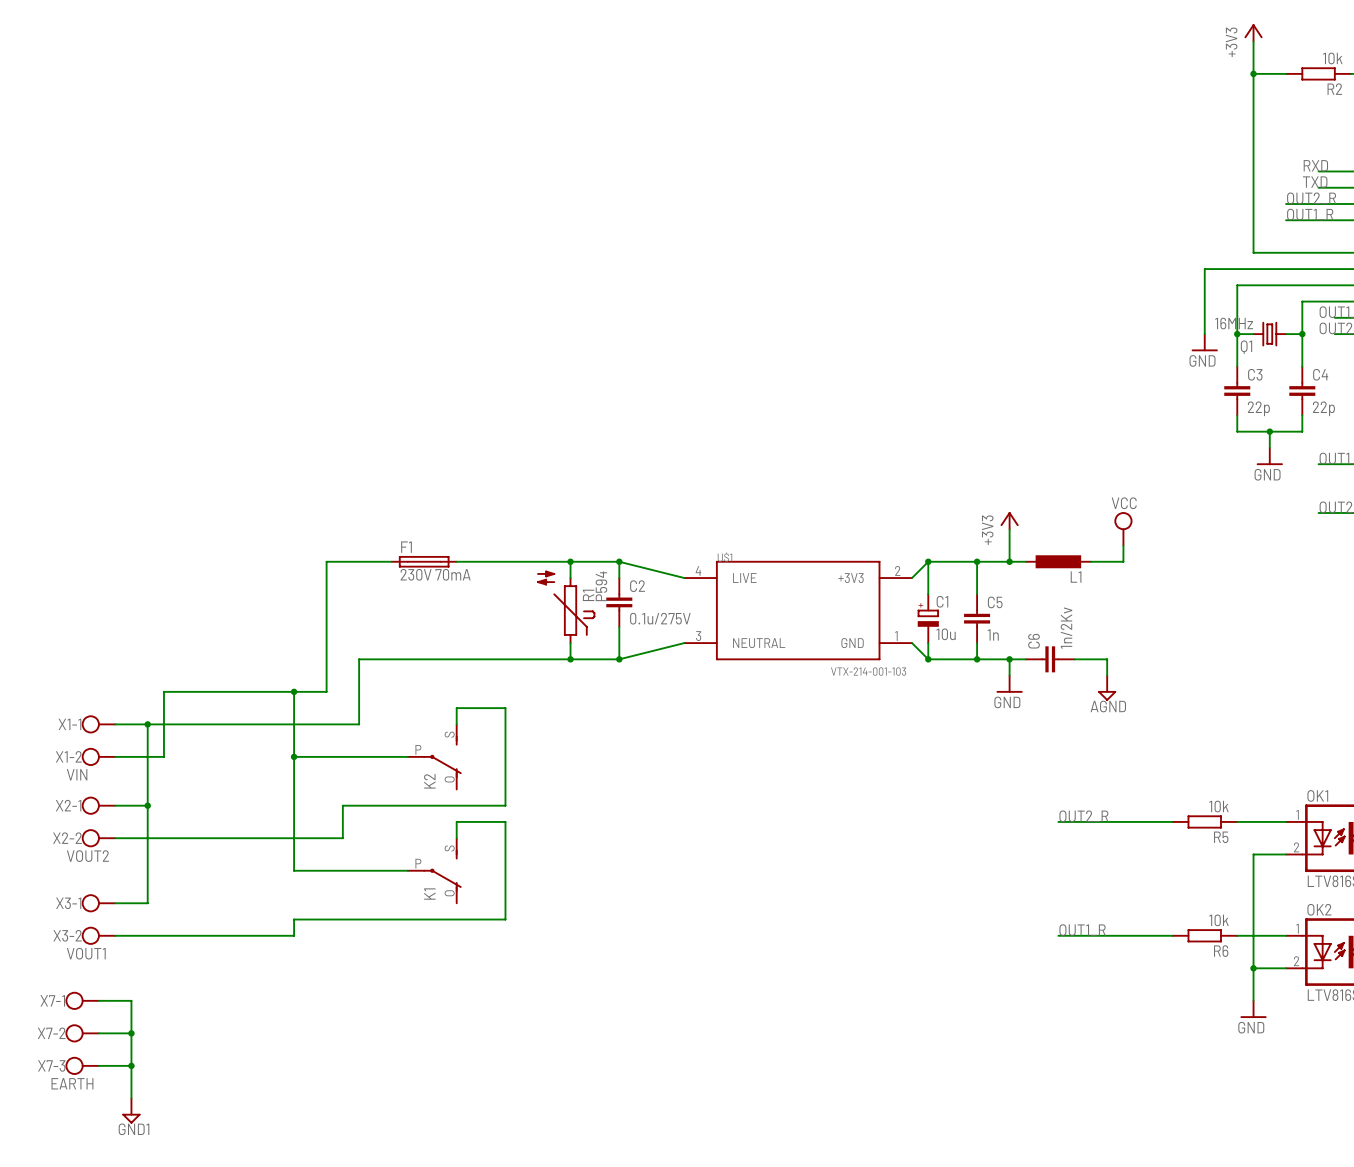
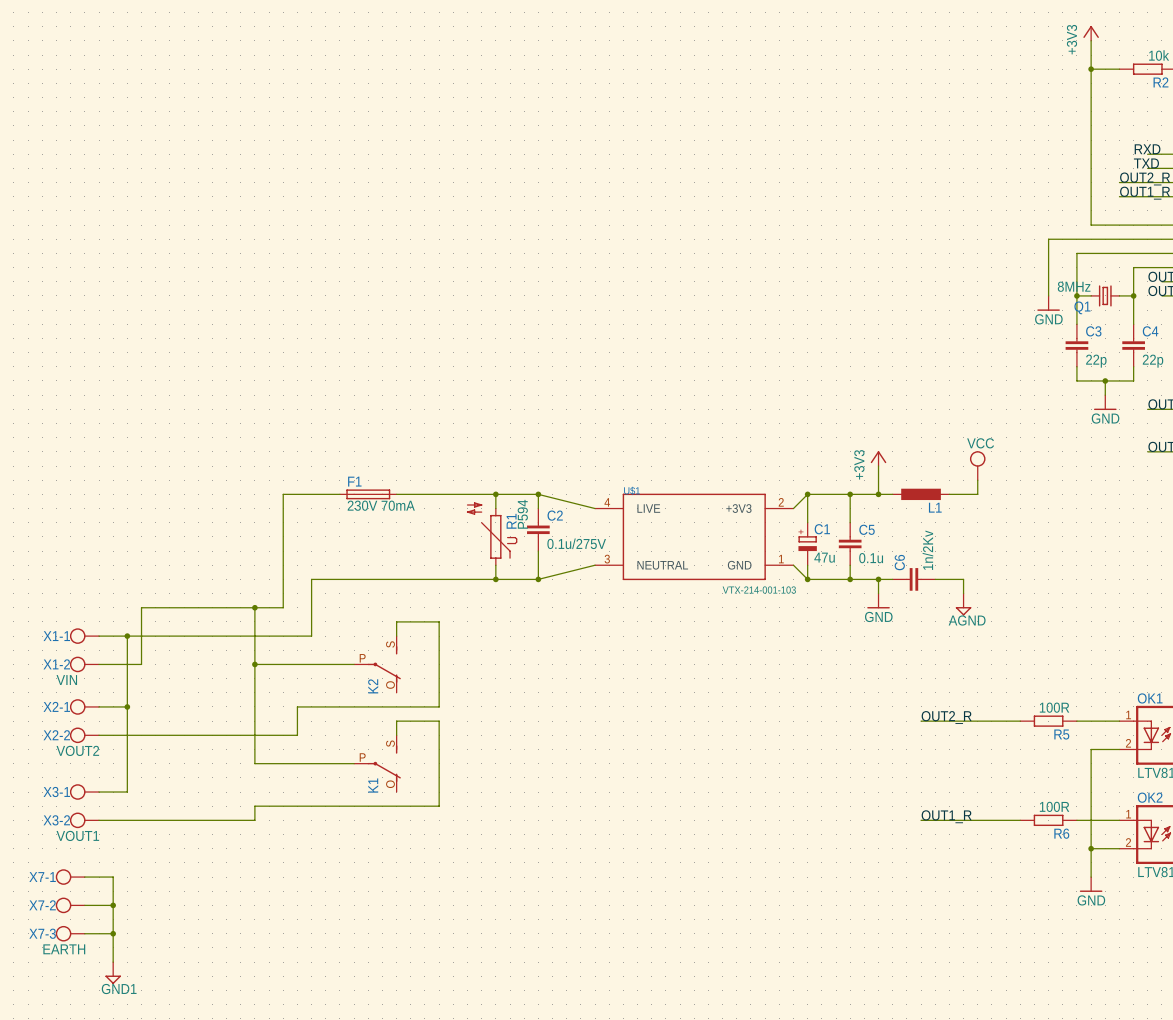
Q1 value: 16MHz (1234, 323) -> 8MHz (1074, 286)
C1 value: 10u (946, 634) -> 47u (824, 557)
C5 value: 1n (993, 634) -> 0.1u (871, 558)
R5 value: 10k (1218, 806) -> 100R (1054, 707)
R6 value: 10k (1218, 920) -> 100R (1054, 806)

